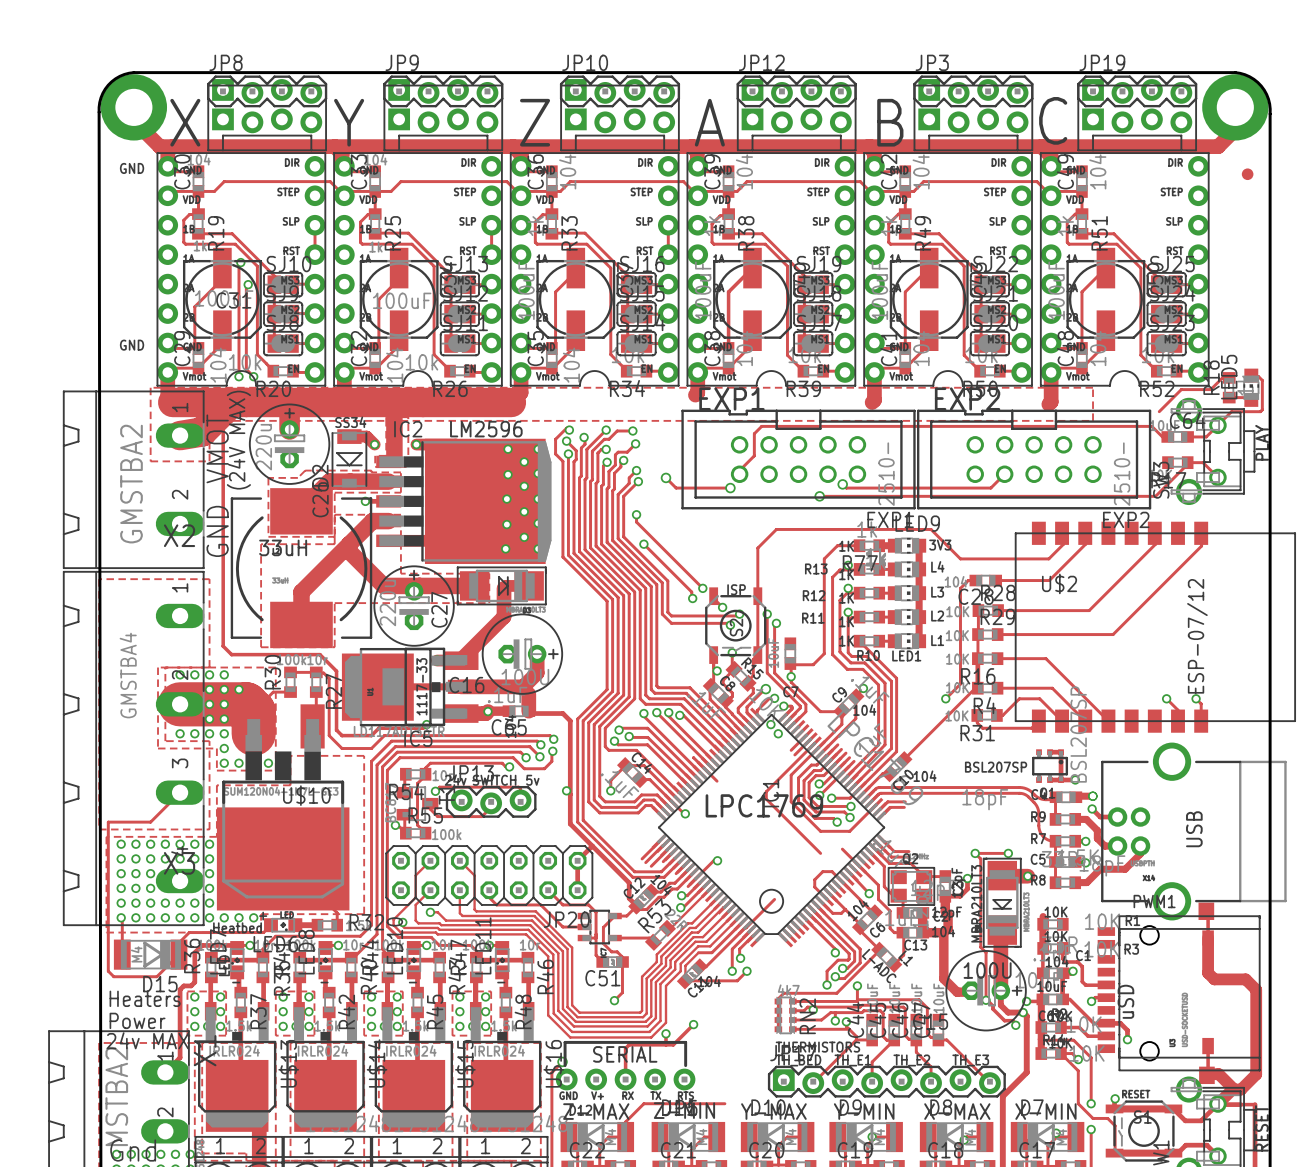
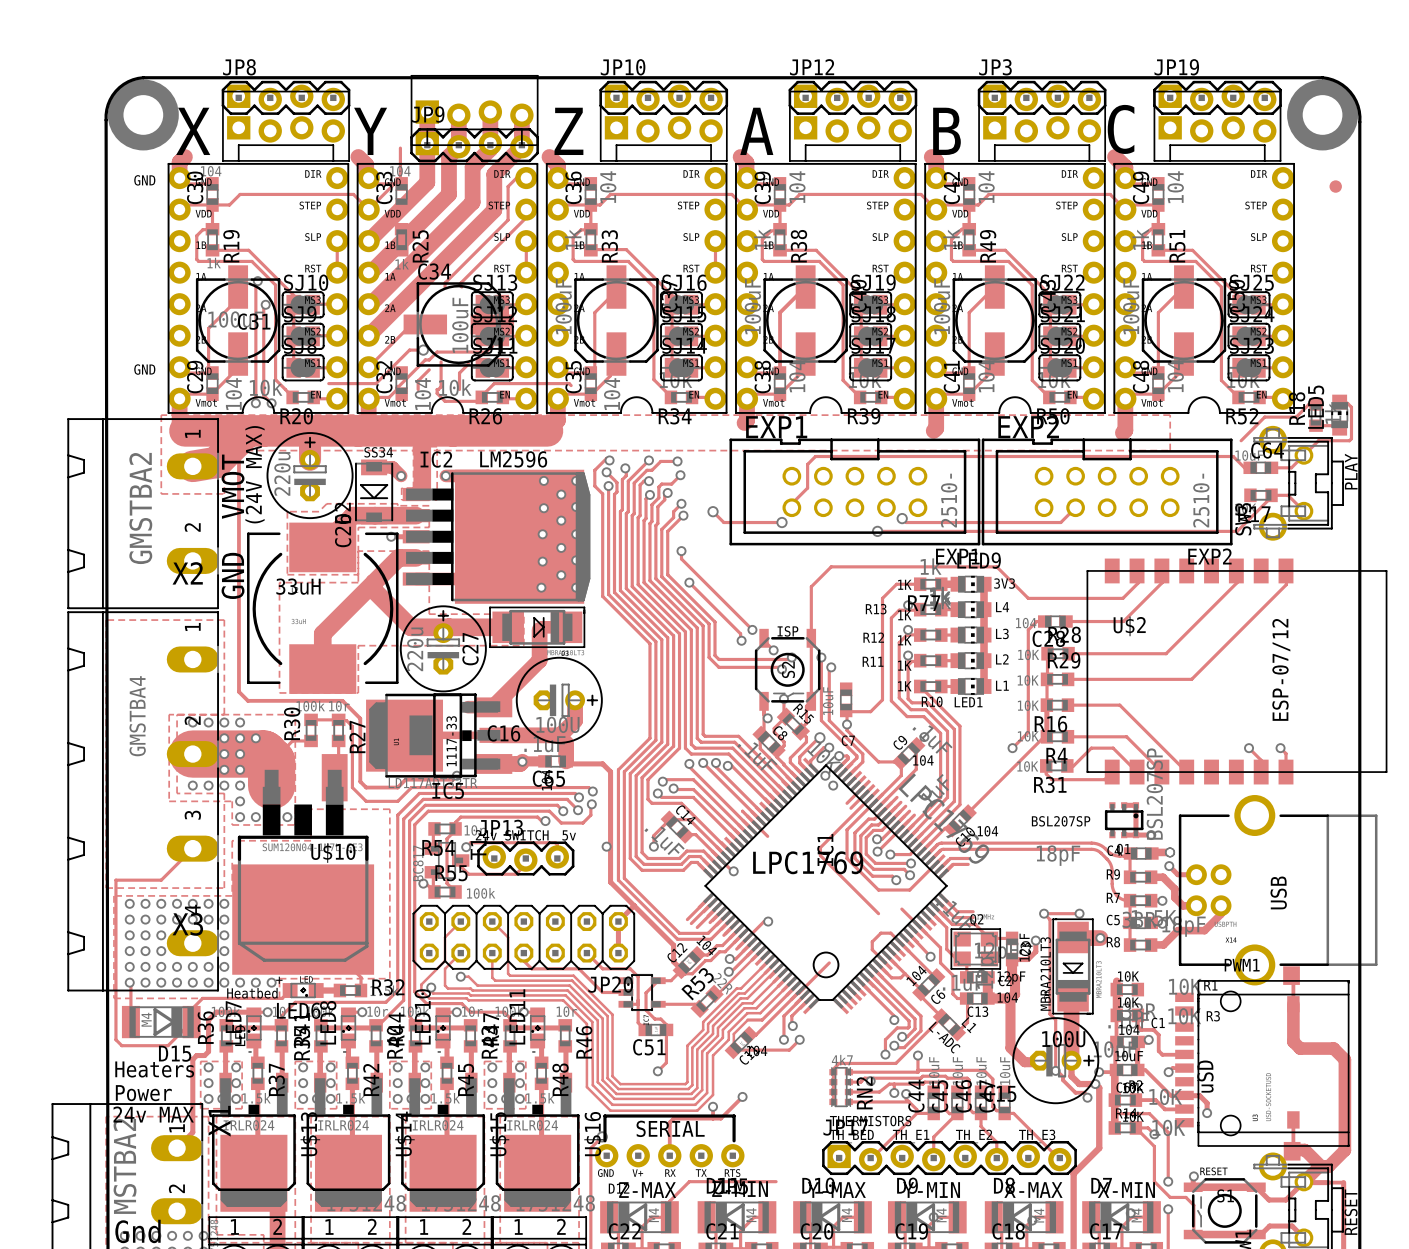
JP9 position: (443, 91) -> (474, 145)
track: none -> (427, 112) (427, 182) (368, 241)
track: none -> (490, 112) (490, 149) (472, 166) (472, 202) (368, 304)
track: none -> (458, 115) (458, 146) (448, 156) (448, 194) (368, 272)
track: none -> (521, 115) (521, 146) (494, 174) (494, 210) (368, 335)
track: (1232, 109) (1232, 131) (1218, 146) (159, 146) (135, 122) -> none
part position: (443, 117) -> (474, 110)
track: none -> (526, 178) (516, 178) (508, 186) (508, 220) (445, 283) (445, 287)
track: (348, 191) (391, 191) (400, 181) (506, 181) (521, 195) -> (373, 204) (400, 177) (400, 148)
track: (375, 191) (375, 214) (367, 214) (360, 222) (360, 242) (362, 244) (412, 244) (434, 266) (434, 354) (452, 373) (448, 373) -> (441, 361) (441, 386) (437, 389) (437, 393) (445, 401) (477, 401) (479, 399)
track: none -> (526, 209) (526, 217) (460, 283) (461, 287)
track: (375, 233) (408, 233) (451, 275) (451, 343) -> none
track: (399, 268) (397, 280) (378, 299) (378, 344) (375, 348) (349, 348) (344, 343) -> (425, 324) (411, 324) (368, 367)
C34 rotation: 0° (399, 299) -> 90° counterclockwise (458, 324)
track: none -> (492, 324) (492, 346) (486, 352) (437, 352) (429, 359) (425, 359) (397, 388)
track: none -> (423, 350) (409, 350) (376, 383) (328, 383)
via: none -> (423, 350)
track: (399, 330) (400, 343) (376, 367) (348, 368) -> none
track: none -> (468, 363) (459, 373) (459, 389)
track: none -> (429, 369) (418, 380) (418, 389)
track: none -> (397, 386) (397, 389) (389, 397) (368, 398)
track: none -> (571, 385) (569, 383) (494, 383) (481, 397)

